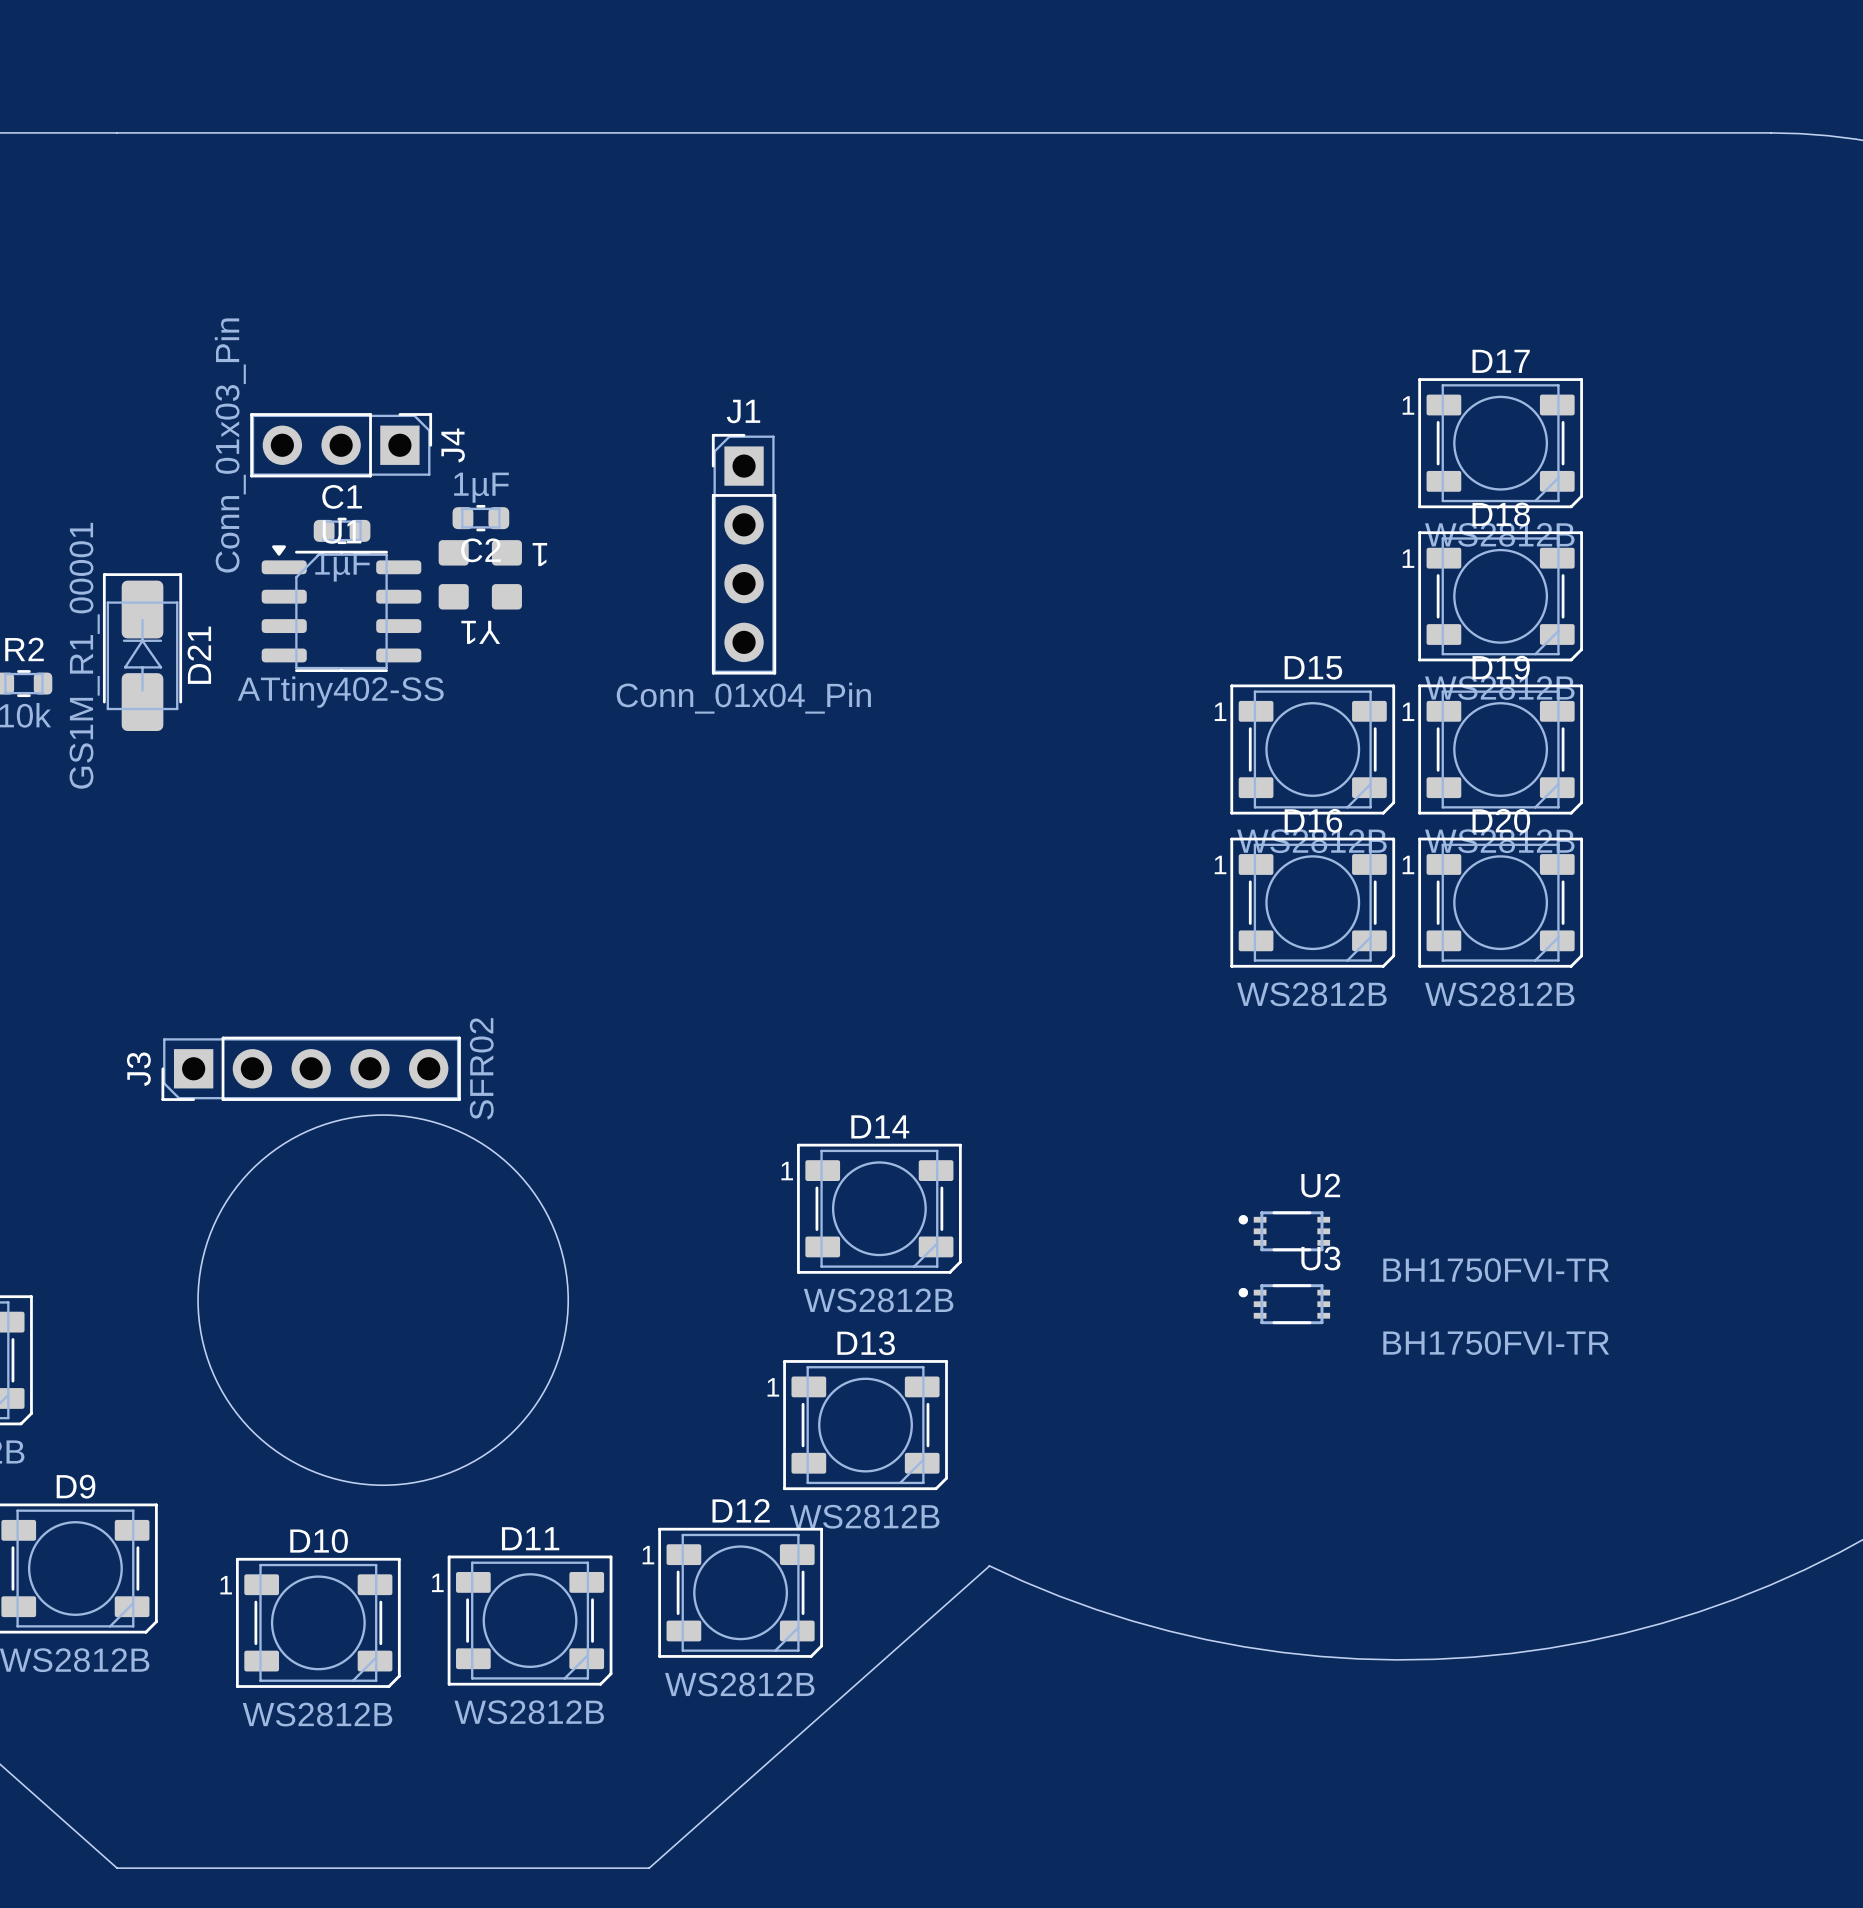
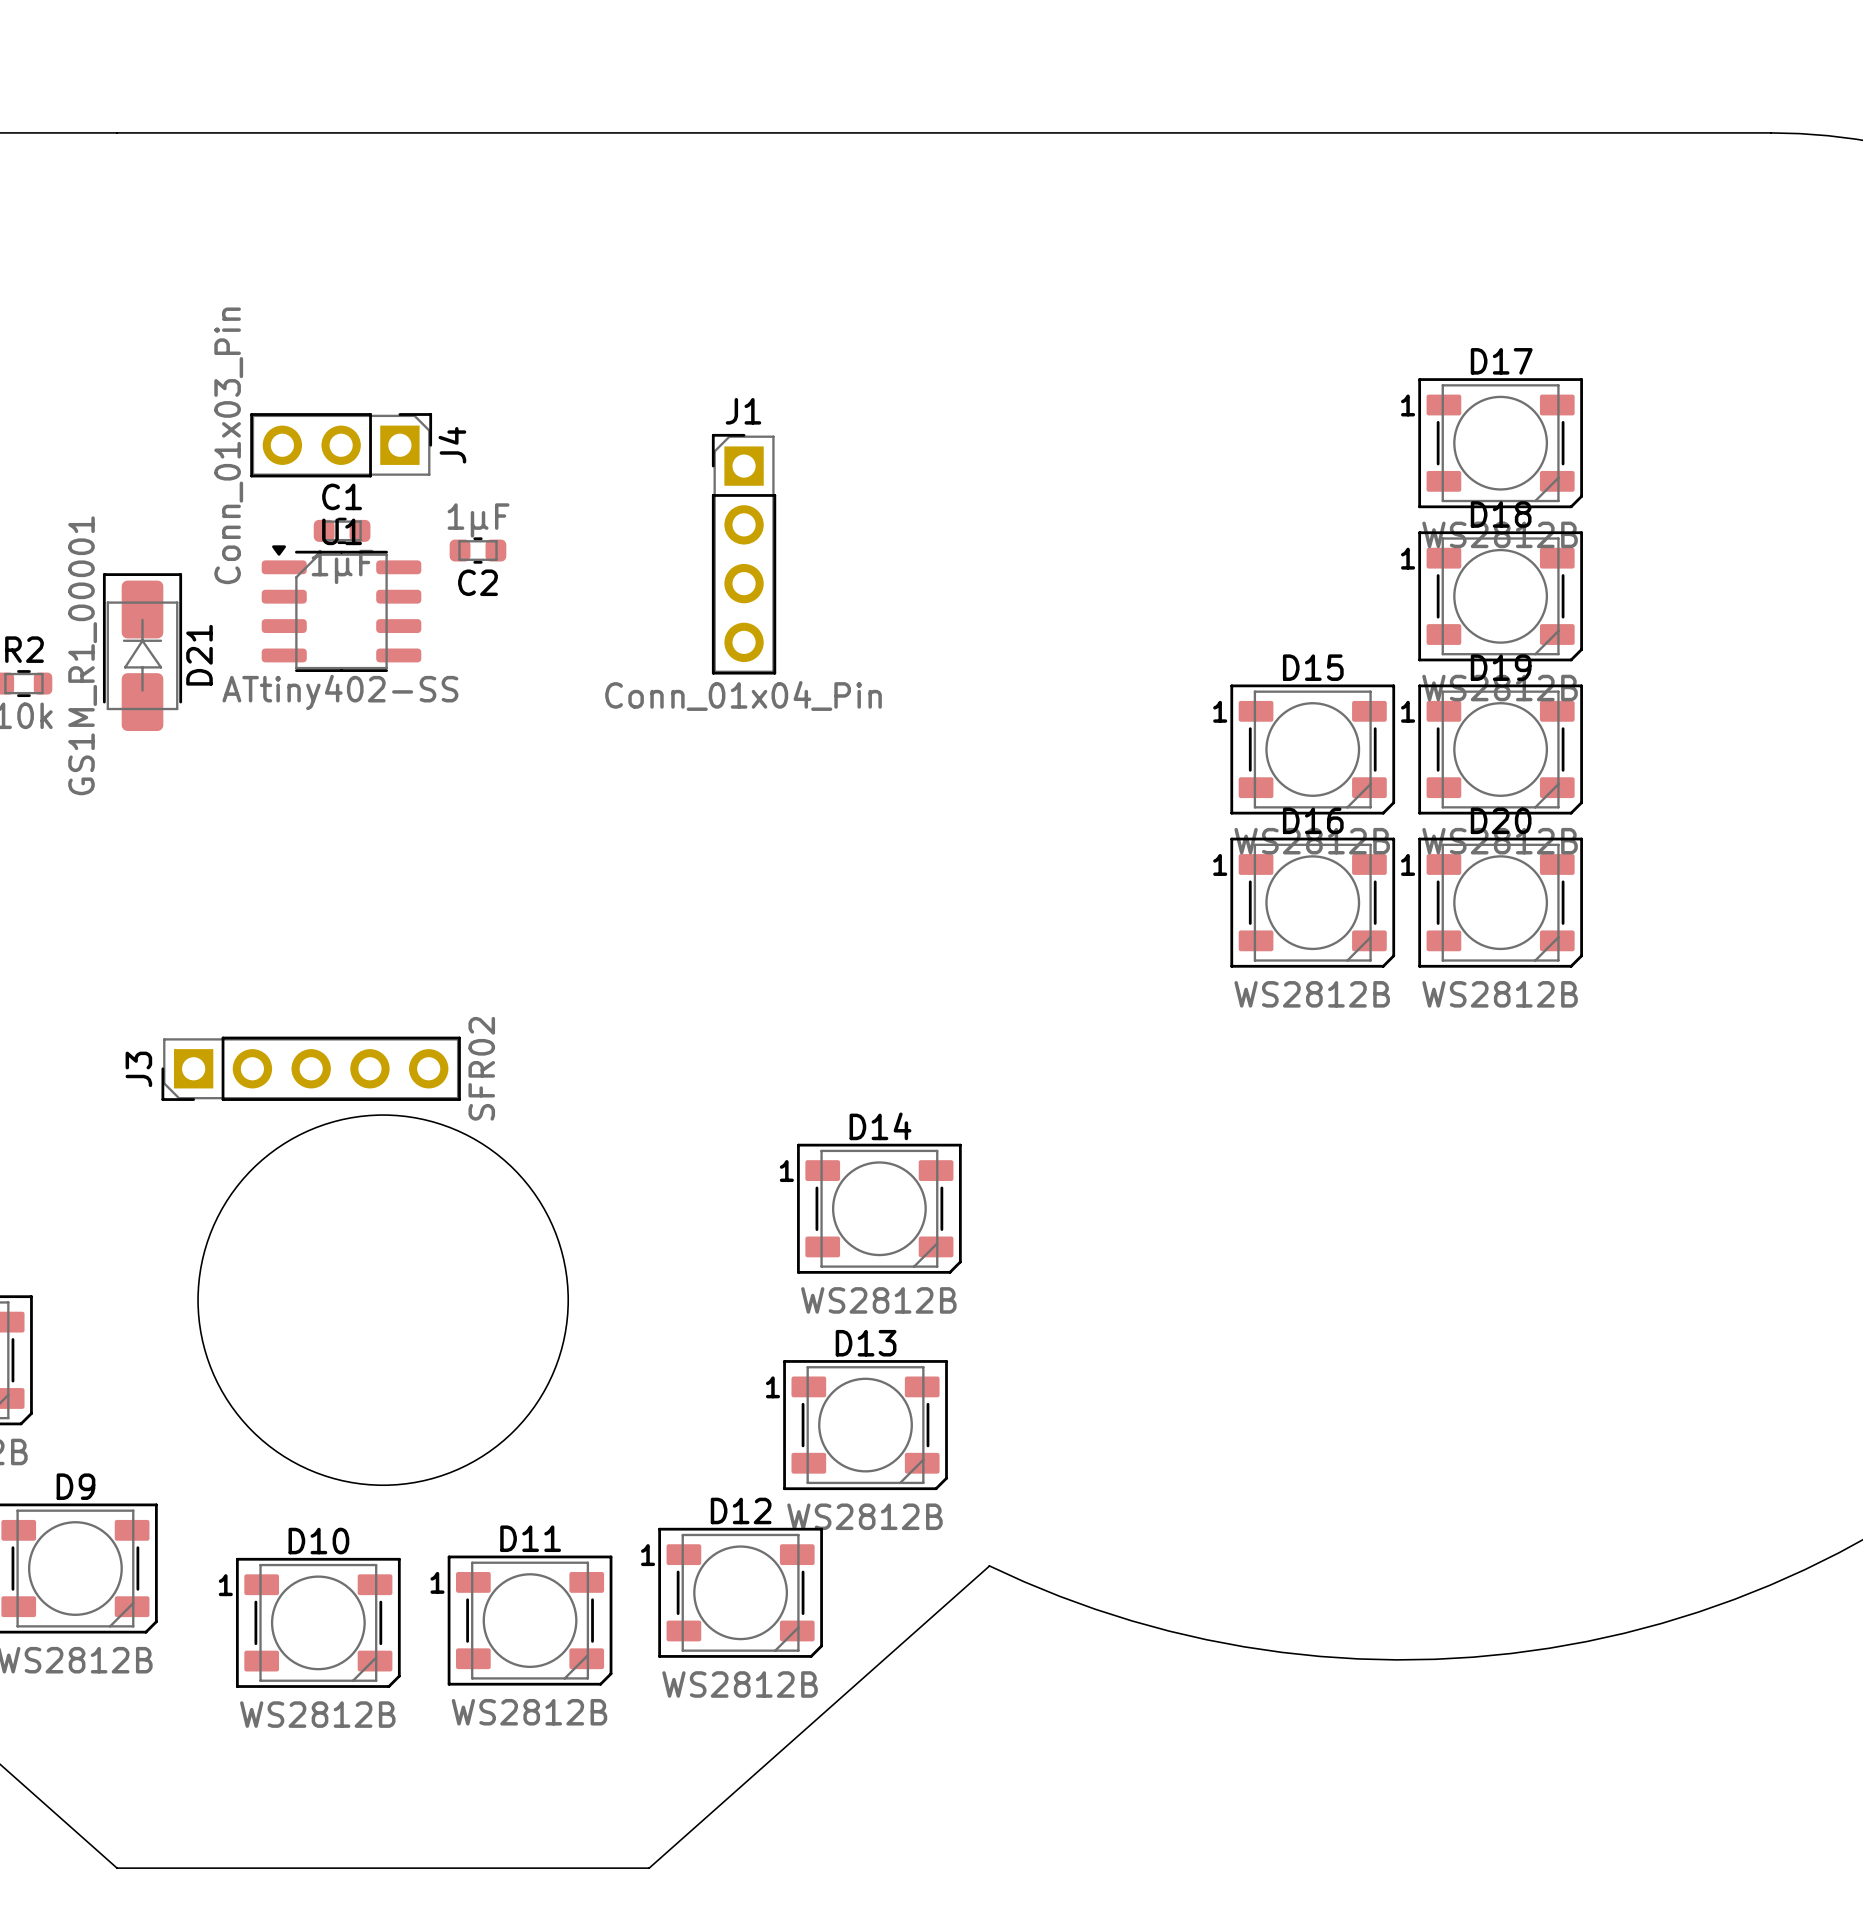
C2 position: (480, 518) -> (477, 550)
Y1: (480, 574) -> none
U2: BH1750FVI-TR (1284, 1231) -> none
U3: BH1750FVI-TR (1284, 1304) -> none

